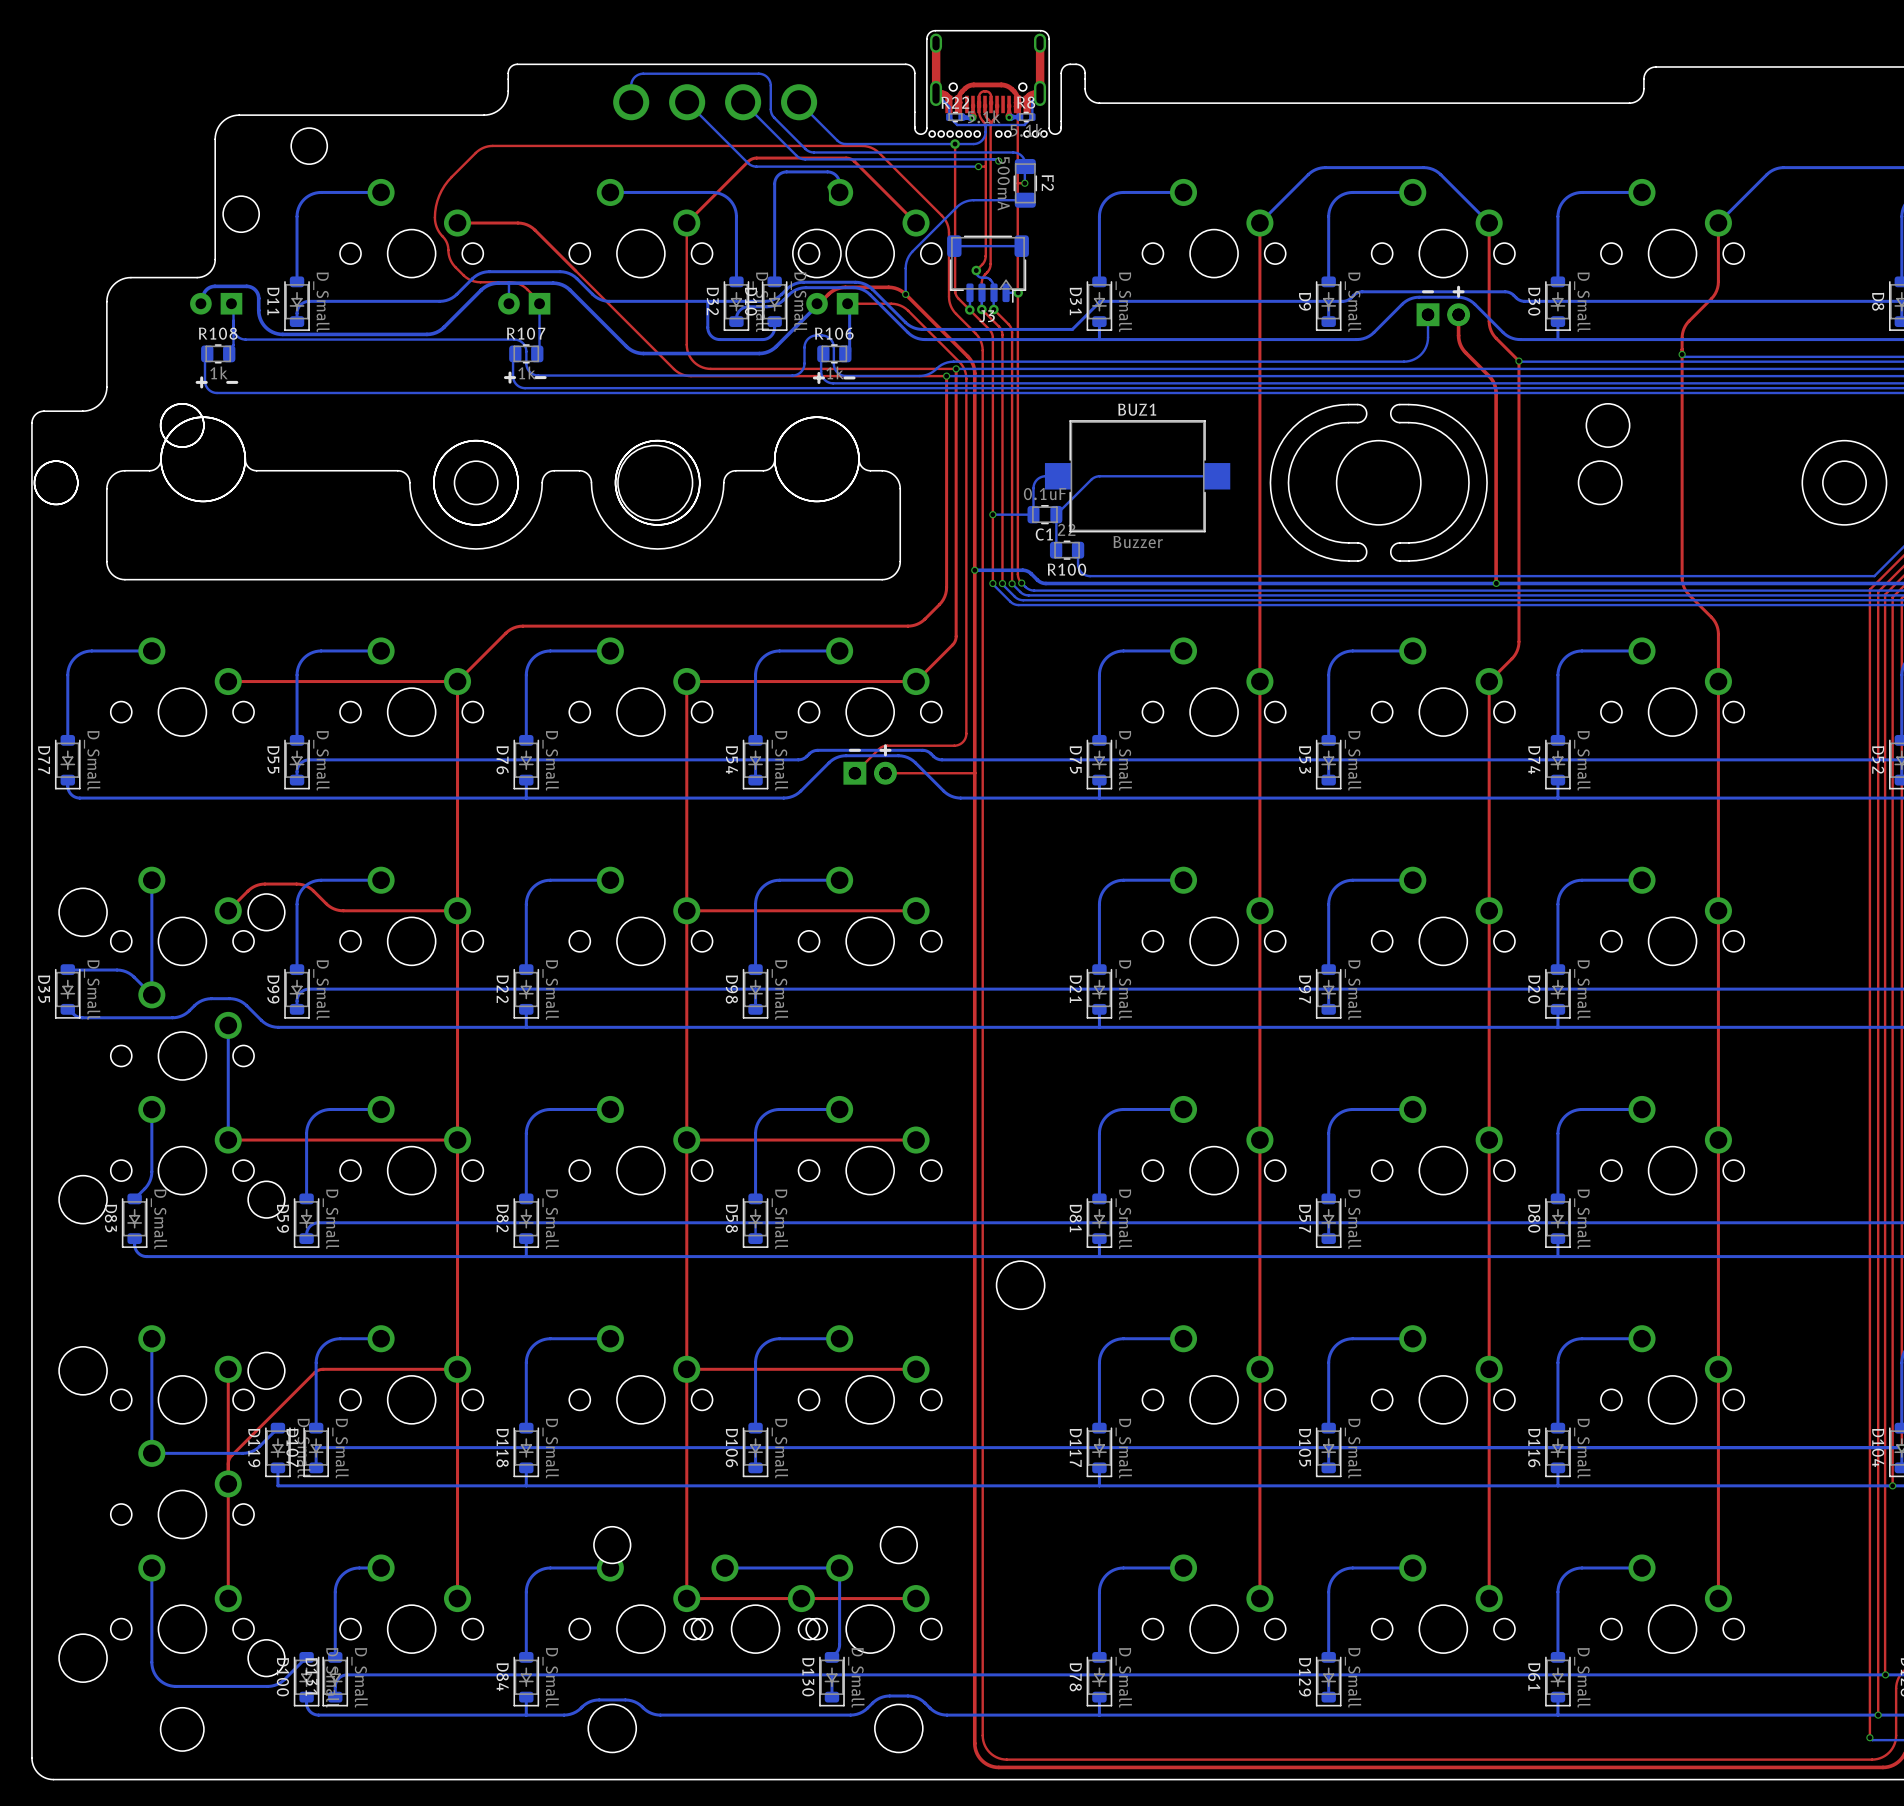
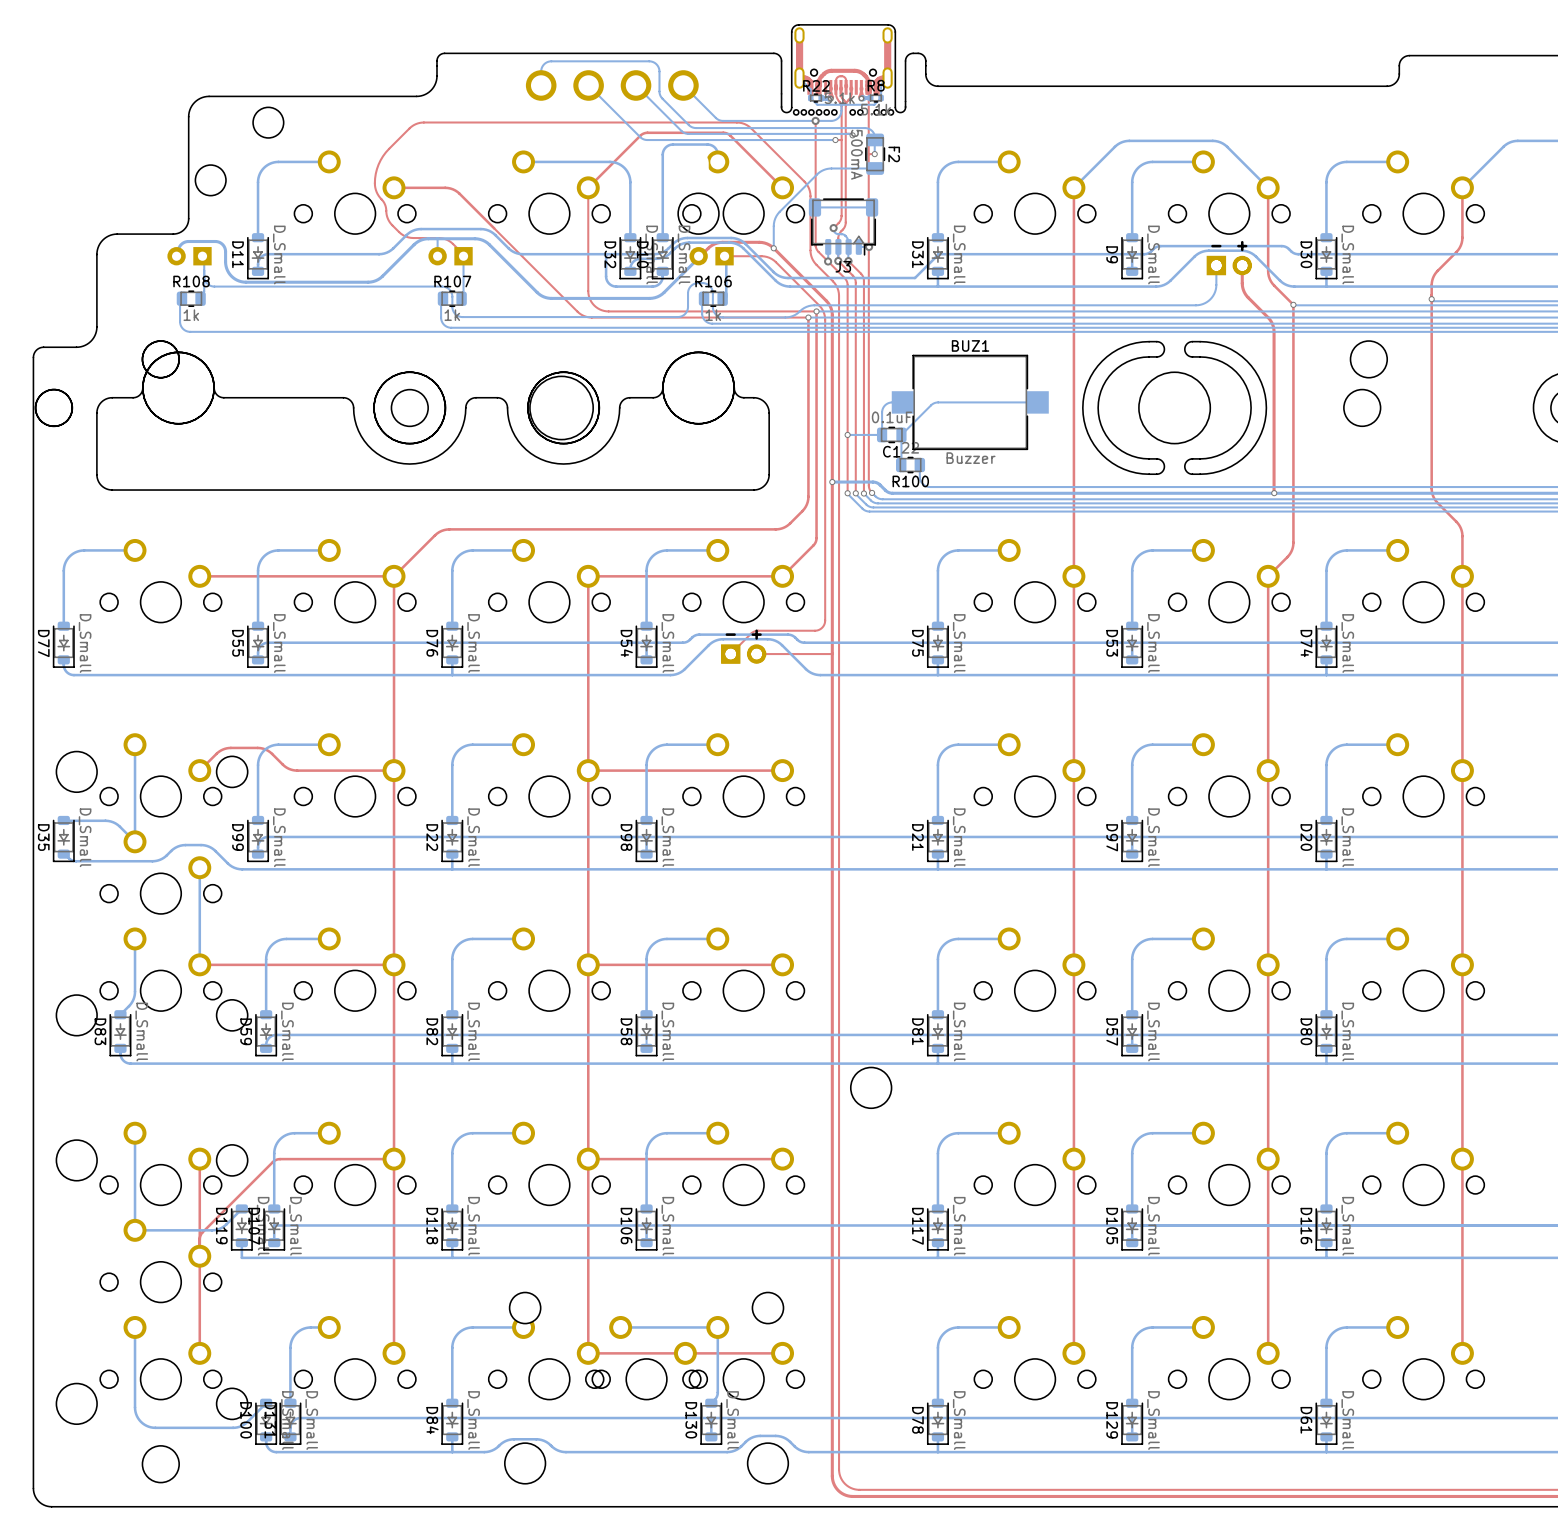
drawing: [503, 371, 547, 384] -> none
drawing: [812, 371, 856, 385] -> none
drawing: [195, 376, 239, 389] -> none

